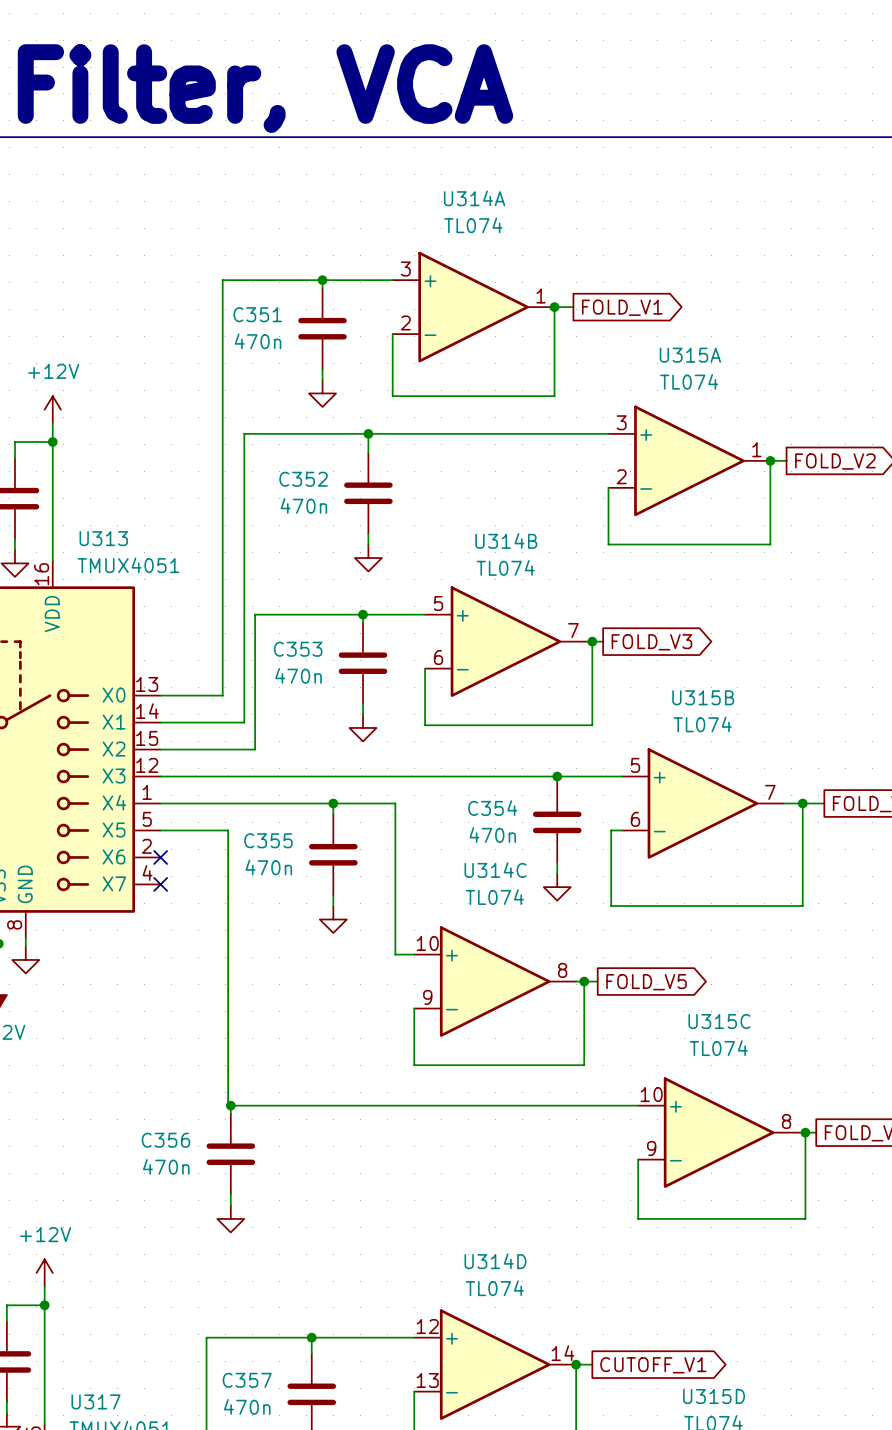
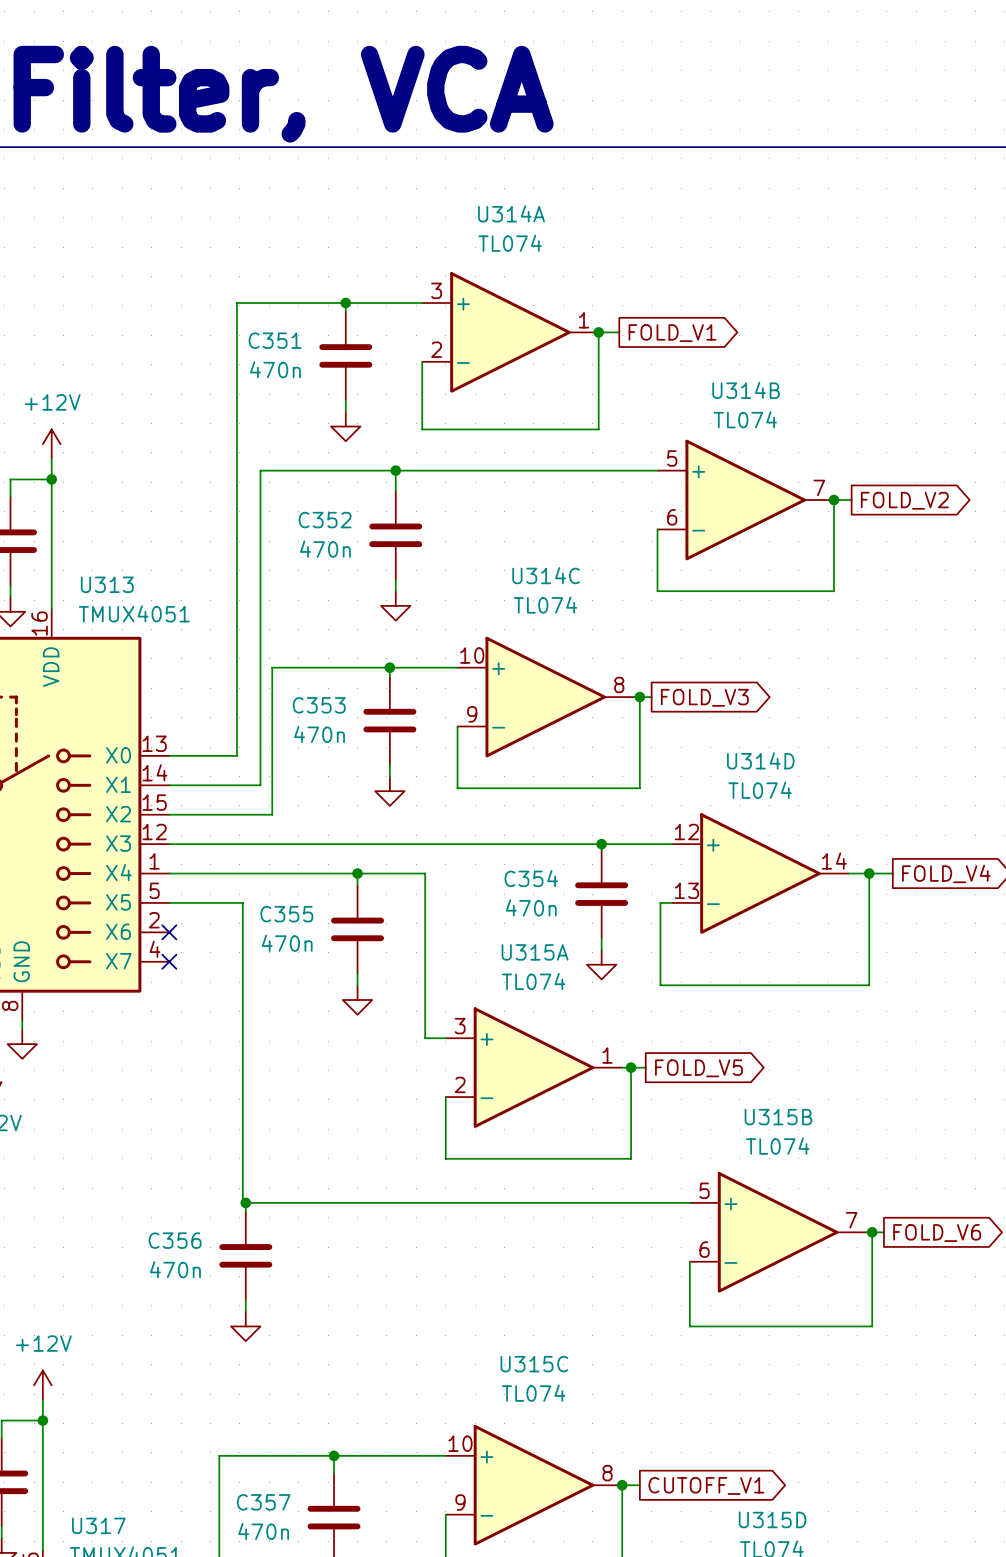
U315A position: (689, 460) -> (533, 1067)
U314B position: (505, 641) -> (745, 500)
U315B position: (702, 803) -> (778, 1232)
U314C position: (495, 981) -> (545, 697)
U315C position: (719, 1132) -> (533, 1485)
U314D position: (495, 1364) -> (760, 873)

